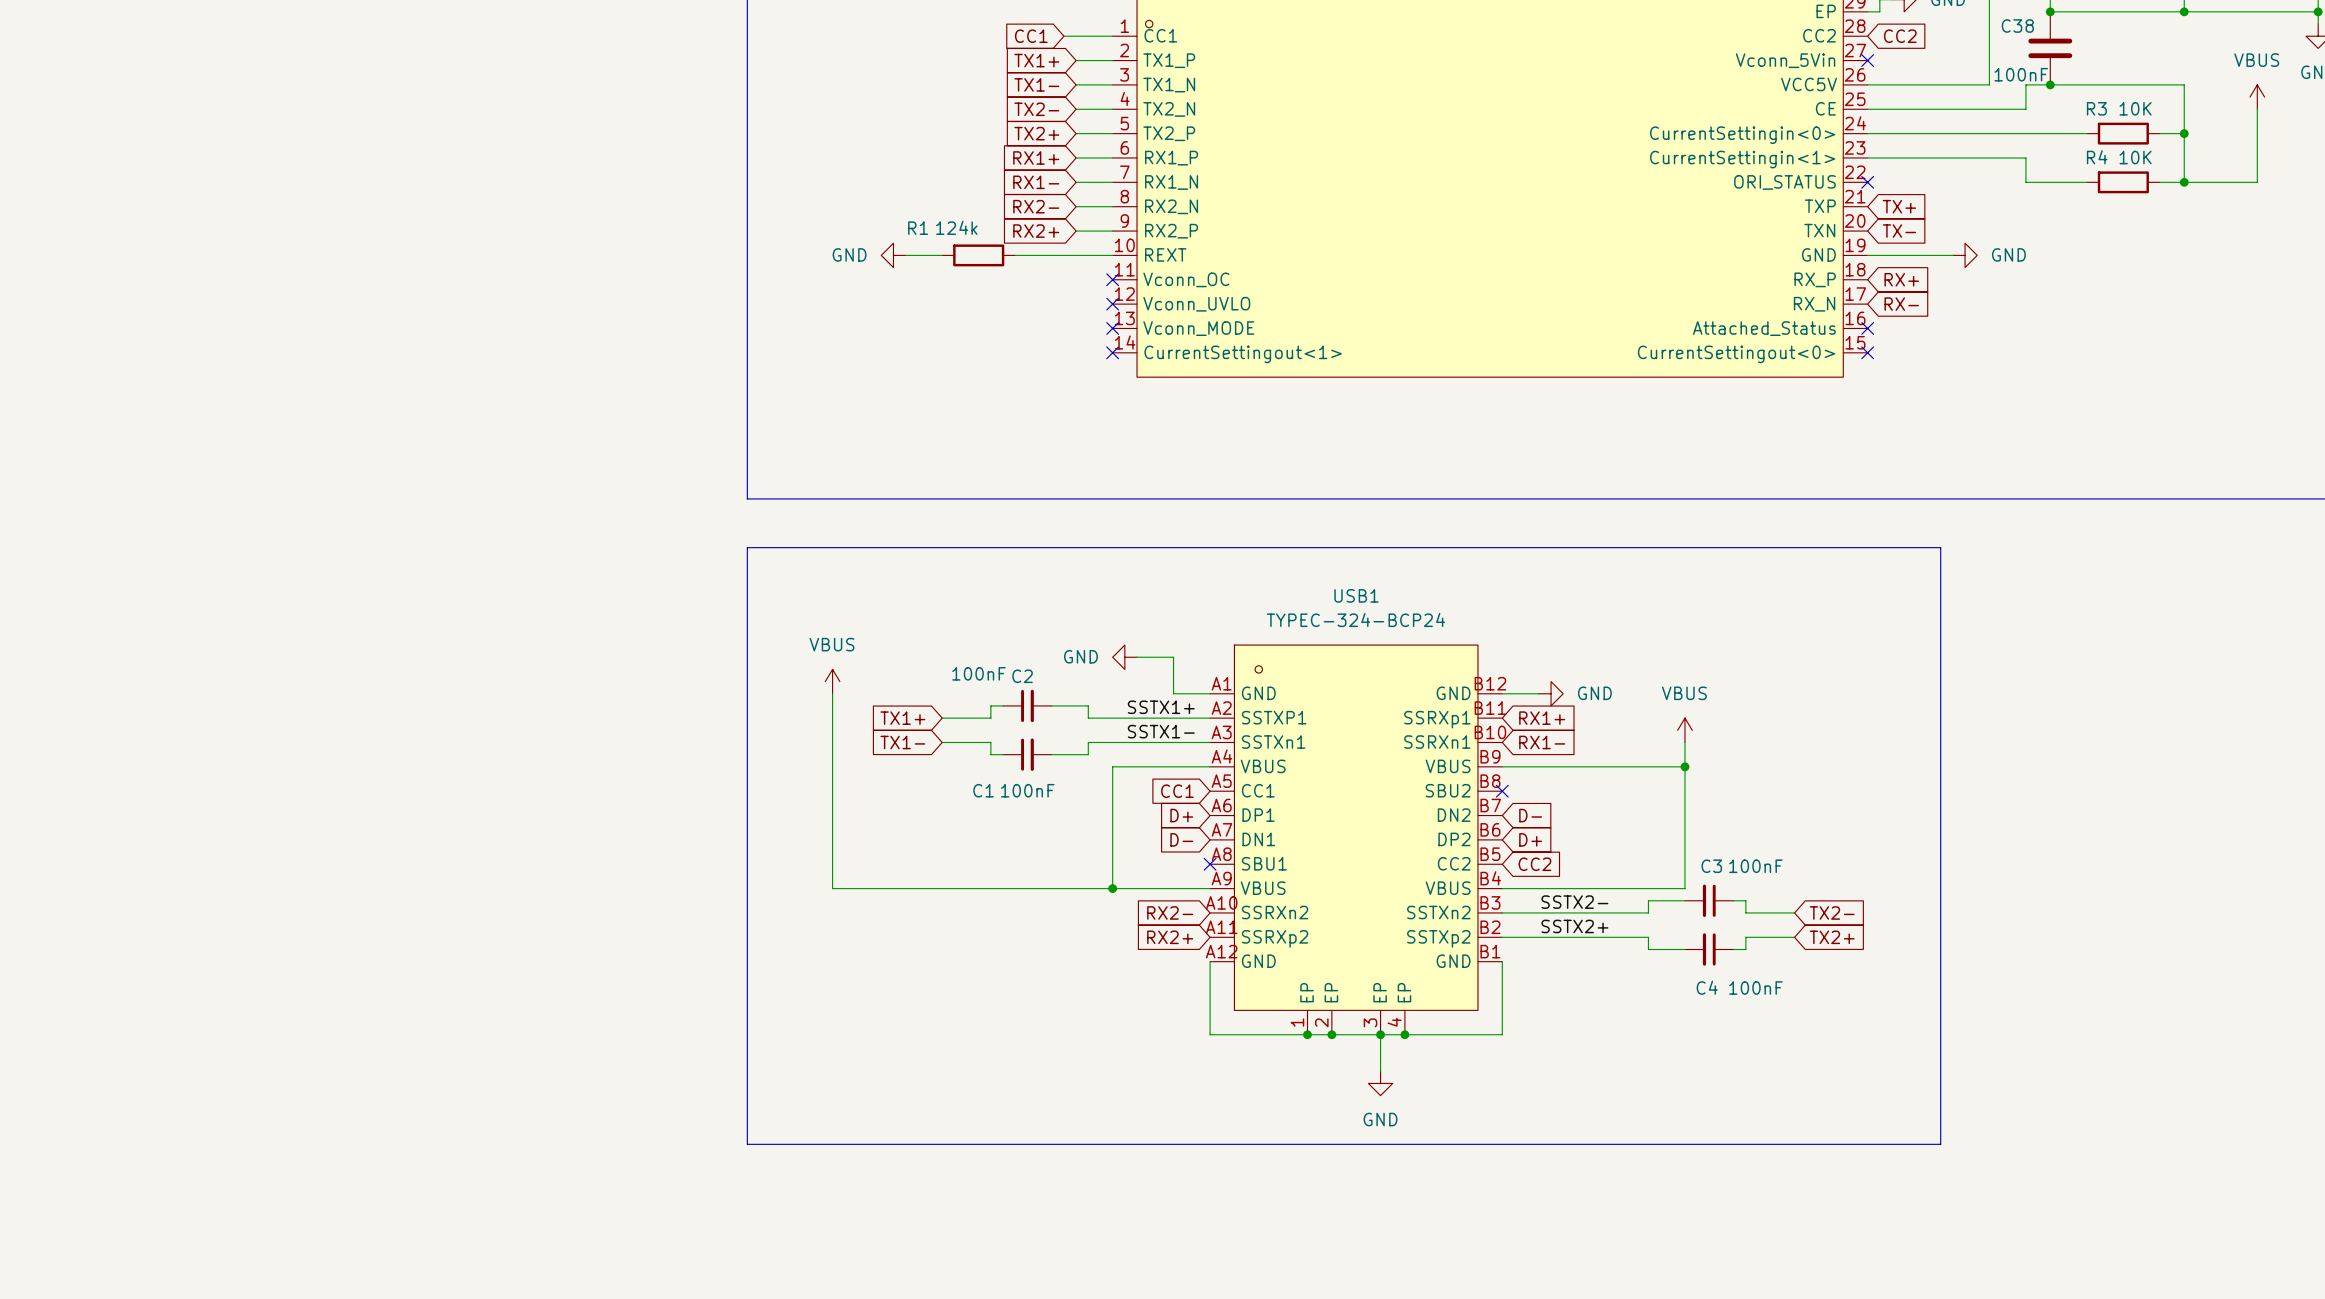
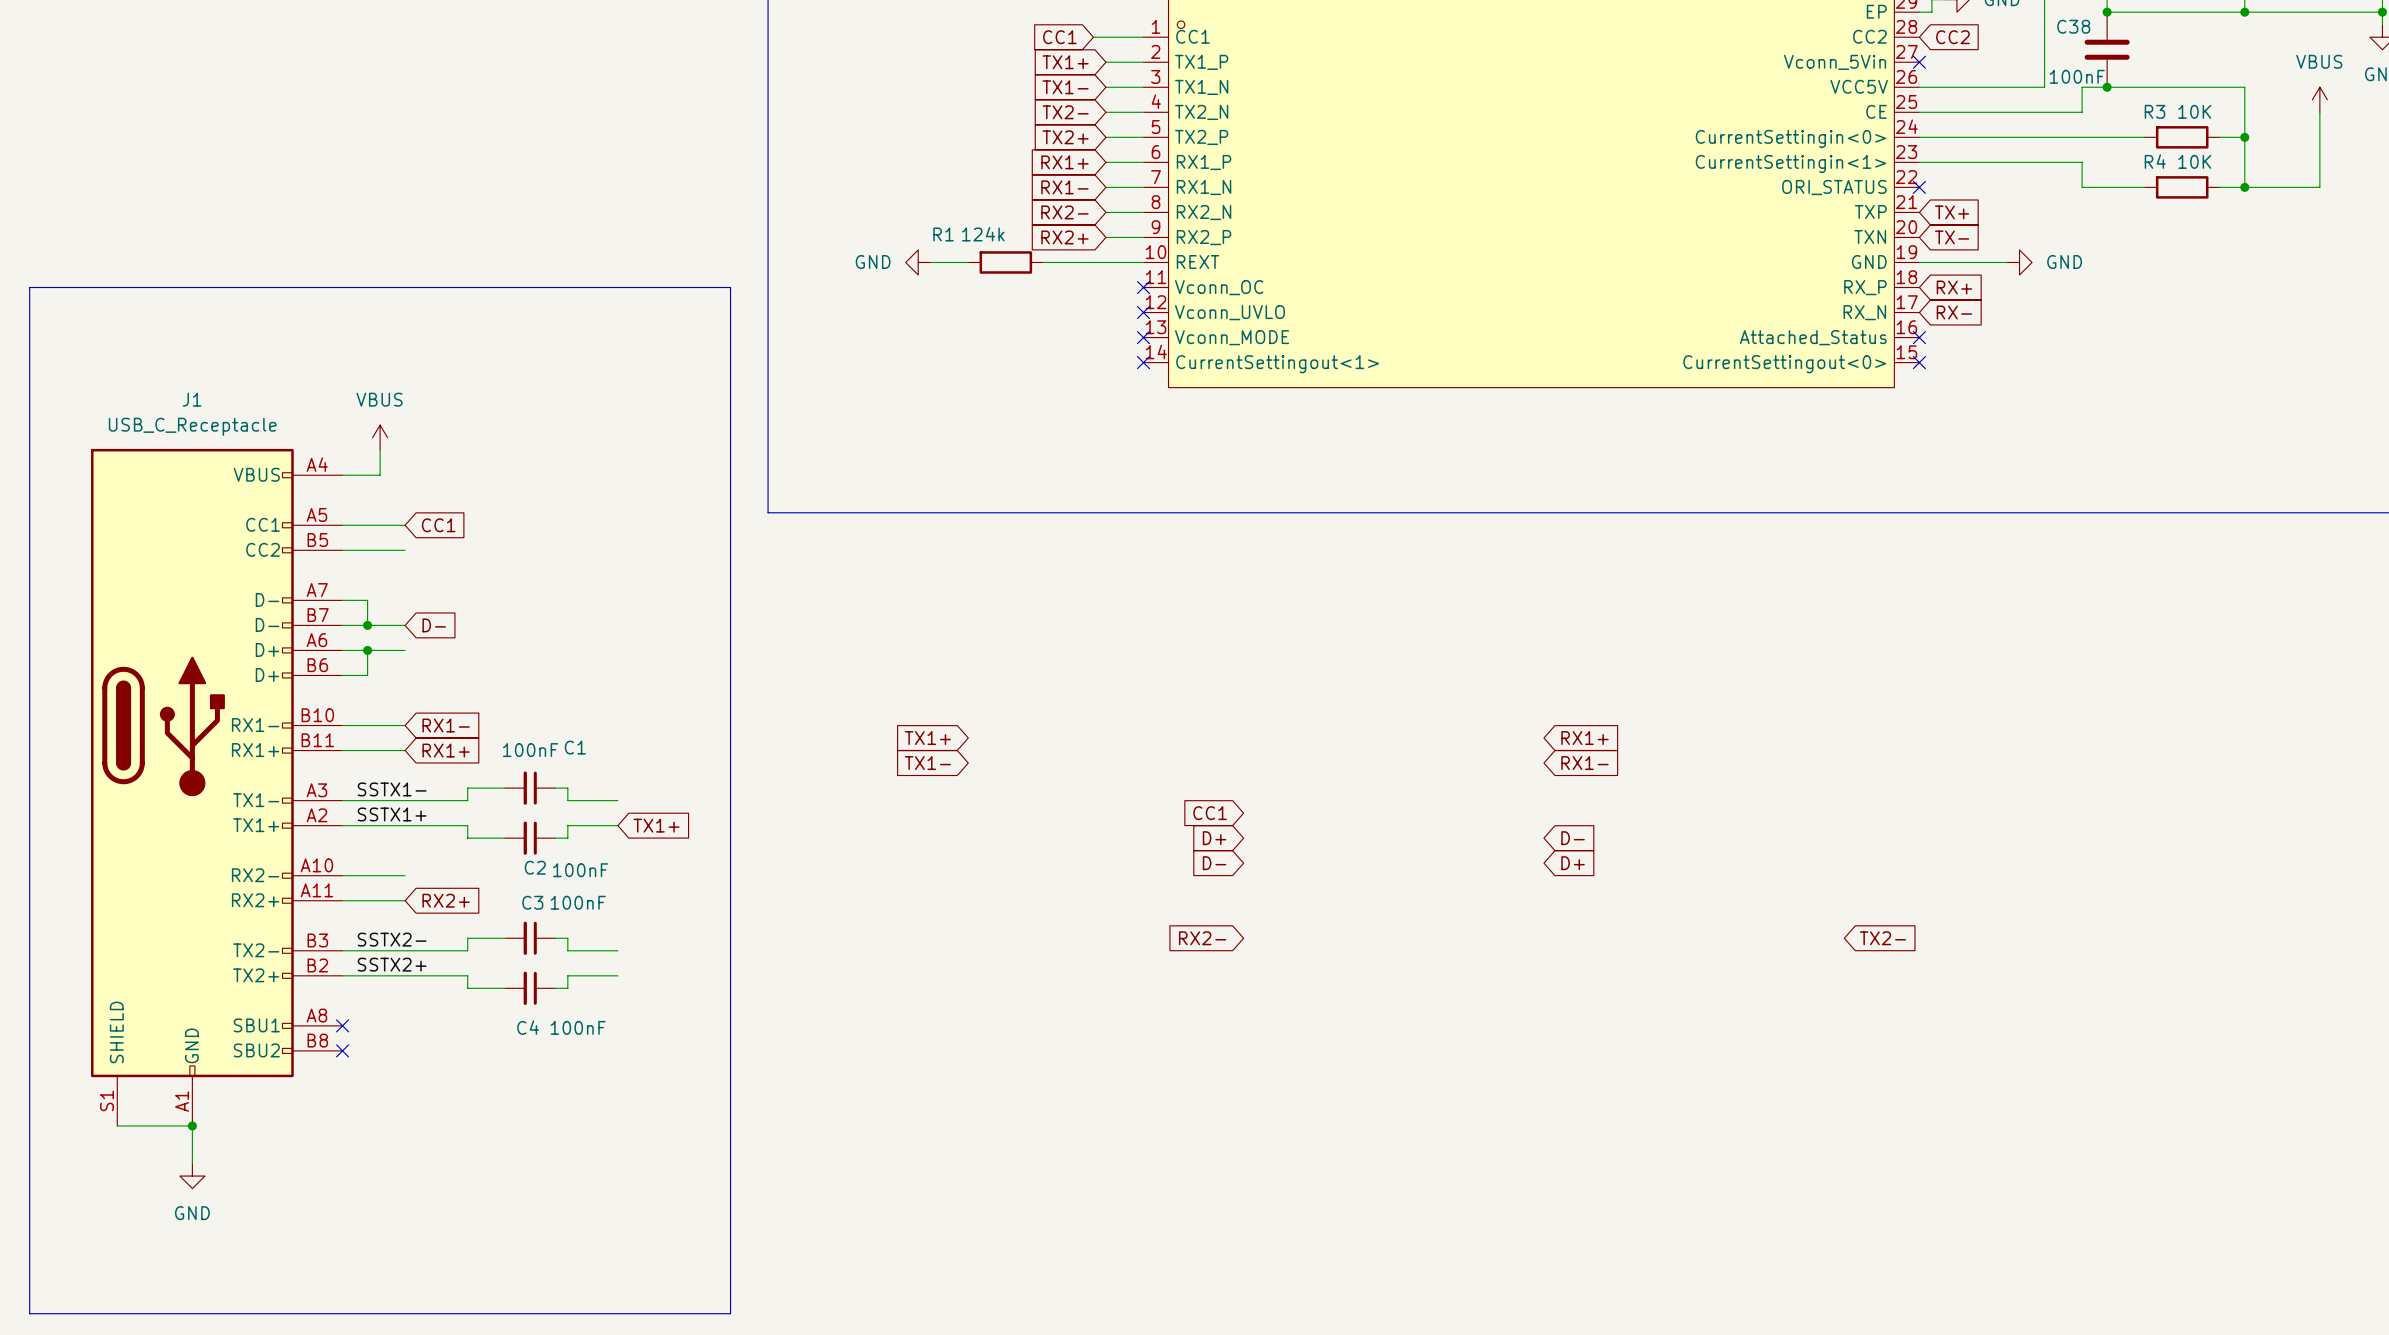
line: none -> (29, 287) (730, 287) (730, 1313) (29, 1313) (29, 287)
power symbol: none -> VBUS (380, 437)
wire: none -> (380, 450) (380, 475) (342, 475)
wire: none -> (342, 525) (405, 525)
global label: none -> CC1 (438, 525)
wire: none -> (342, 550) (405, 550)
line: (747, 547) (1940, 547) (1940, 1144) (747, 1144) (747, 547) -> none
wire: none -> (342, 600) (367, 600) (367, 625)
wire: none -> (342, 625) (405, 625)
junction: none -> (367, 625)
global label: none -> D- (434, 625)
wire: none -> (342, 650) (405, 650)
wire: none -> (367, 650) (367, 675) (342, 675)
junction: none -> (367, 650)
power symbol: GND (1124, 657) -> none
wire: (1137, 657) (1173, 657) (1173, 693) (1210, 693) -> none
power symbol: VBUS (832, 681) -> none
wire: (832, 693) (832, 888) (1210, 888) -> none
wire: (1502, 693) (1538, 693) -> none
power symbol: GND (1551, 693) -> none
wire: none -> (342, 725) (405, 725)
global label: none -> RX1- (446, 725)
wire: (1003, 705) (990, 705) (990, 718) (942, 718) -> none
C2 rotation: 0° (1027, 705) -> 180° (530, 838)
C2 position: (1027, 705) -> (530, 838)
wire: (1051, 705) (1088, 705) (1088, 718) (1210, 718) -> none
label: SSTX1+ (1161, 707) -> none
wire: none -> (342, 750) (405, 750)
global label: none -> RX1+ (446, 750)
power symbol: VBUS (1684, 730) -> none
label: SSTX1- (1161, 731) -> none
wire: (942, 742) (990, 742) (990, 754) (1003, 754) -> none
wire: (1210, 742) (1088, 742) (1088, 754) (1051, 754) -> none
wire: (1684, 742) (1684, 888) (1502, 888) -> none
C1 rotation: 0° (1027, 754) -> 180° (530, 788)
C1 position: (1027, 754) -> (530, 788)
J1: none -> USB_C_Receptacle (216, 787)
wire: none -> (505, 788) (467, 788) (467, 800) (342, 800)
wire: none -> (555, 788) (567, 788) (567, 800) (617, 800)
wire: (1210, 766) (1112, 766) (1112, 888) -> none
wire: (1502, 766) (1684, 766) -> none
junction: (1684, 766) -> none
label: none -> SSTX1- (392, 789)
no-connect mark: (1502, 791) -> none
label: none -> SSTX1+ (392, 814)
wire: none -> (342, 825) (467, 825) (467, 838) (505, 838)
wire: none -> (617, 825) (567, 825) (567, 838) (555, 838)
global label: none -> TX1+ (656, 825)
USB1: TYPEC-324-BCP24 (1356, 839) -> none
wire: none -> (342, 875) (405, 875)
no-connect mark: (1210, 864) -> none
global label: CC2 (1534, 864) -> none
wire: none -> (342, 900) (405, 900)
global label: none -> RX2+ (446, 900)
junction: (1112, 888) -> none
wire: (1684, 900) (1648, 900) (1648, 912) (1502, 912) -> none
C3 position: (1709, 900) -> (530, 938)
wire: (1733, 900) (1745, 900) (1745, 912) (1794, 912) -> none
label: SSTX2- (1574, 902) -> none
wire: none -> (505, 938) (467, 938) (467, 950) (342, 950)
wire: none -> (555, 938) (567, 938) (567, 950) (617, 950)
label: none -> SSTX2- (392, 939)
label: SSTX2+ (1574, 926) -> none
global label: RX2+ (1170, 937) -> none
wire: (1502, 937) (1648, 937) (1648, 949) (1684, 949) -> none
wire: (1794, 937) (1745, 937) (1745, 949) (1733, 949) -> none
global label: TX2+ (1832, 937) -> none
label: none -> SSTX2+ (392, 964)
wire: none -> (342, 975) (467, 975) (467, 988) (505, 988)
wire: none -> (617, 975) (567, 975) (567, 988) (555, 988)
C4 position: (1709, 949) -> (530, 988)
wire: (1210, 961) (1210, 1034) (1502, 1034) (1502, 961) -> none
no-connect mark: none -> (342, 1025)
no-connect mark: none -> (342, 1050)
junction: (1307, 1034) -> none
junction: (1331, 1034) -> none
wire: (1380, 1034) (1380, 1071) -> none
junction: (1380, 1034) -> none
junction: (1404, 1034) -> none
power symbol: GND (1380, 1083) -> none
wire: none -> (117, 1125) (192, 1125) (192, 1163)
junction: none -> (192, 1125)
power symbol: none -> GND (192, 1176)

